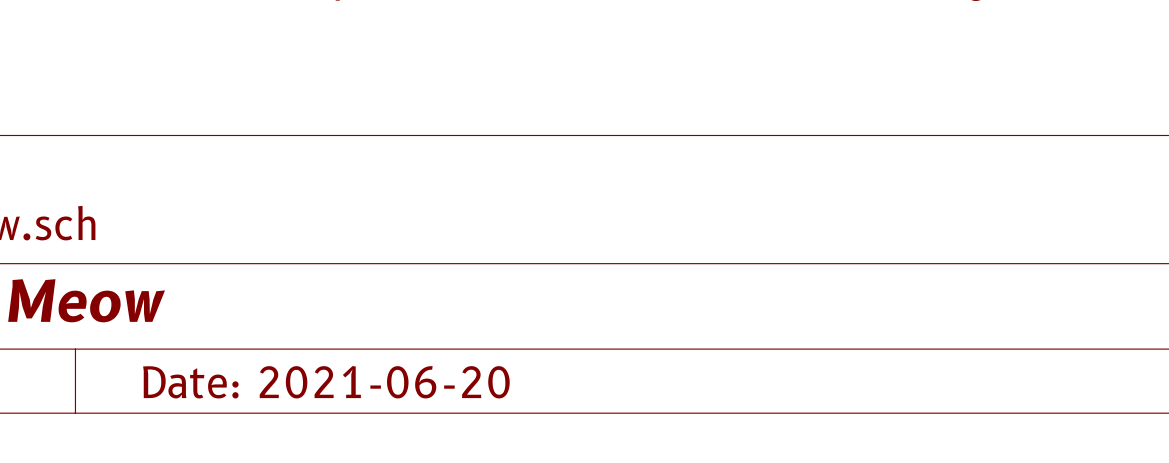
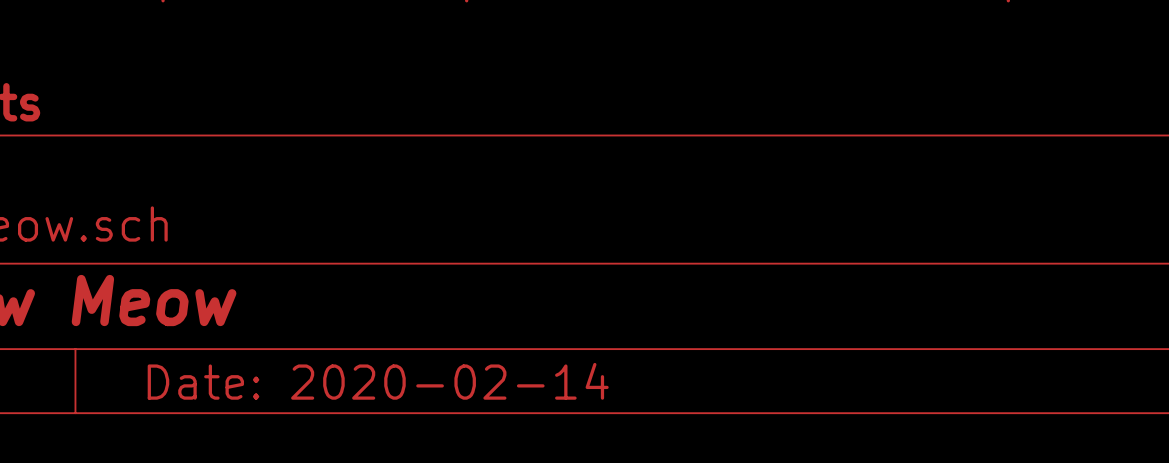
title block: Date: 2021-06-20 (326, 382) -> Date: 2020-02-14 (378, 381)

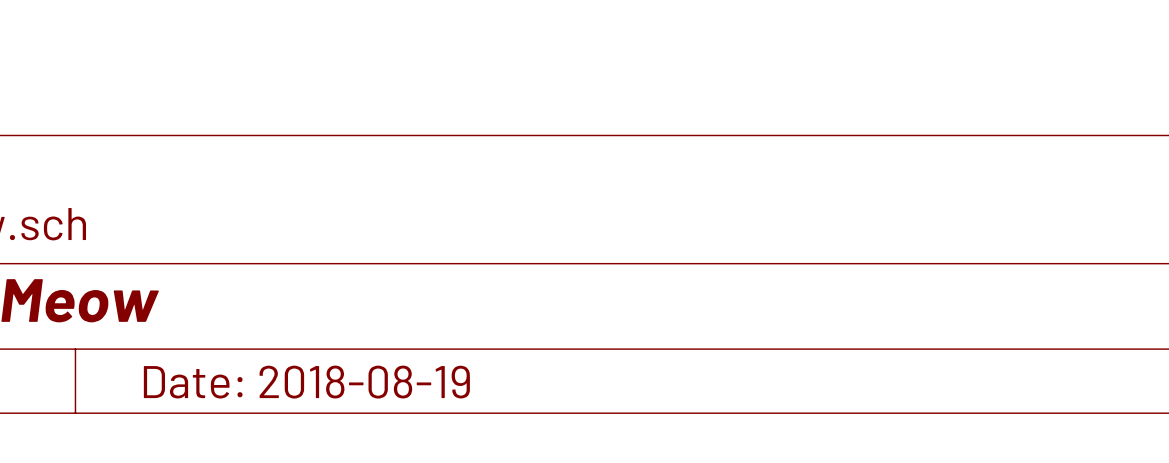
title block: Date: 2020-02-14 (378, 381) -> Date: 2018-08-19 (306, 382)

